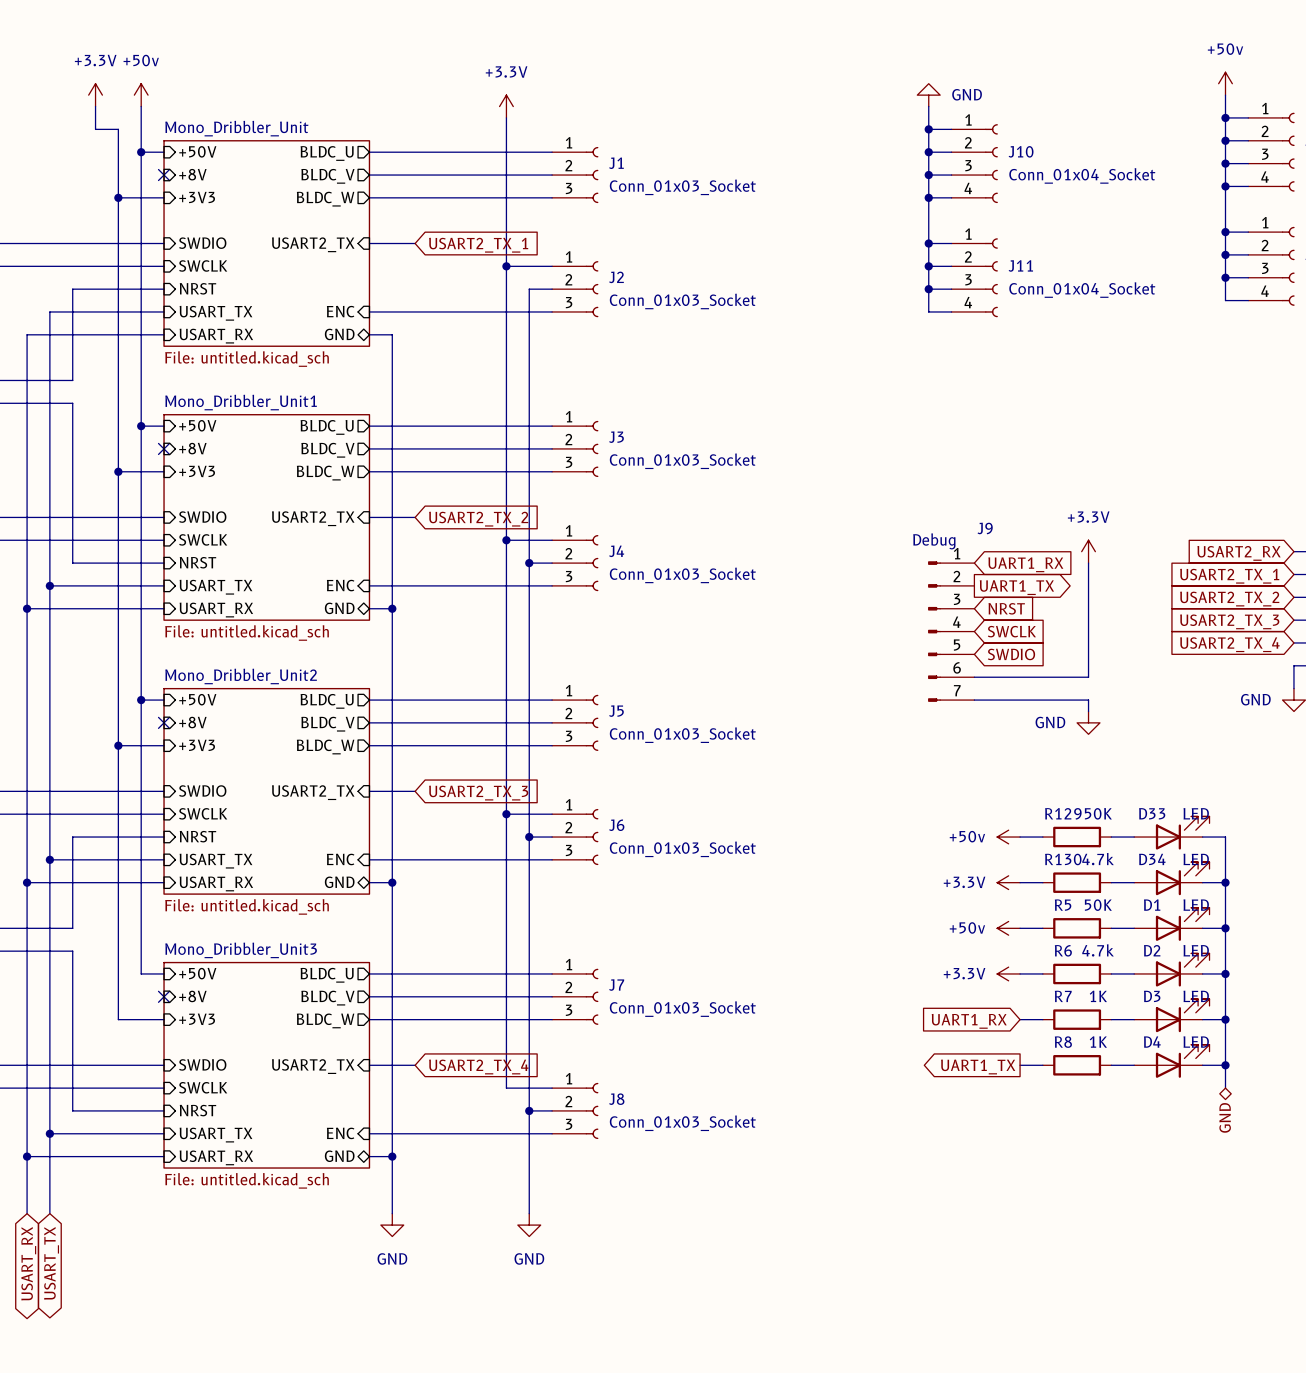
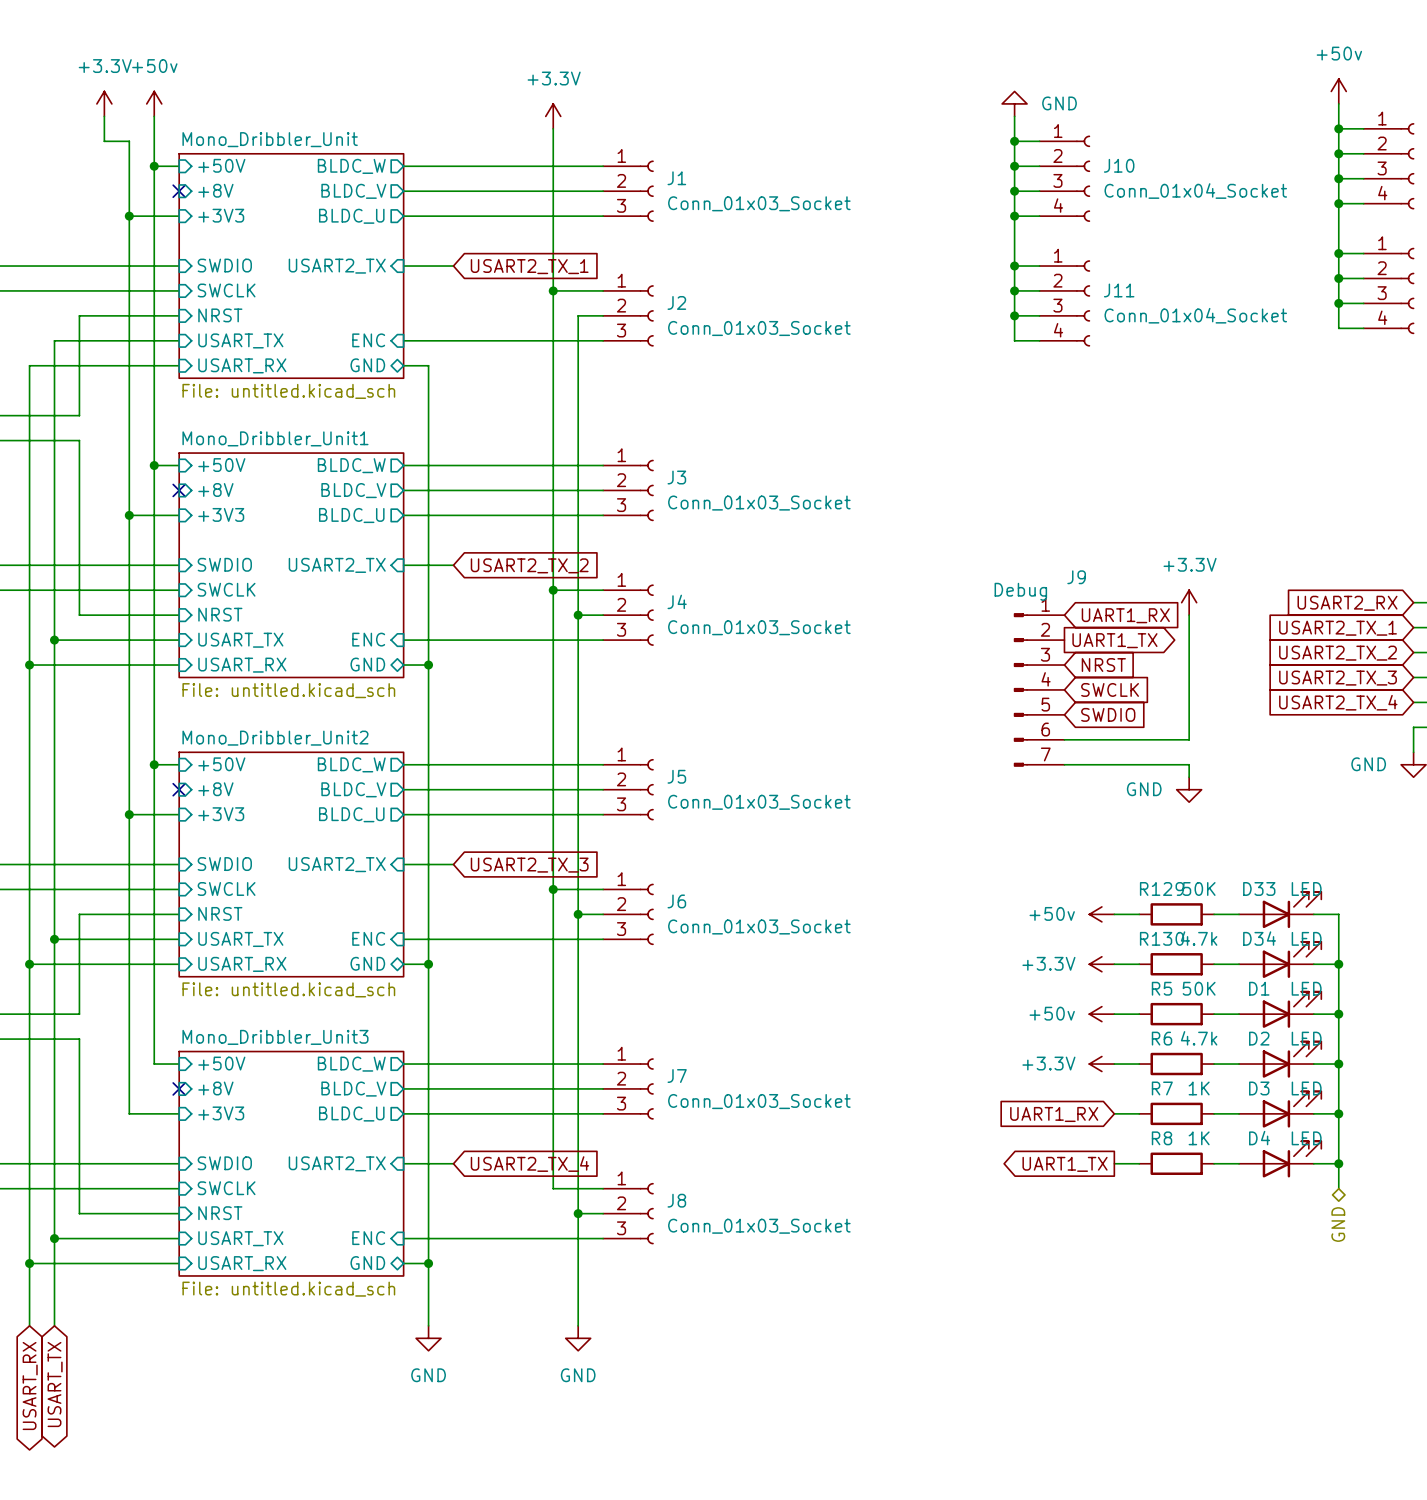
sheet pin: BLDC_U (327, 153) -> BLDC_W (351, 166)
sheet pin: BLDC_W (325, 199) -> BLDC_U (351, 216)
sheet pin: BLDC_U (327, 427) -> BLDC_W (351, 465)
sheet pin: BLDC_W (325, 473) -> BLDC_U (351, 515)
sheet pin: BLDC_U (327, 701) -> BLDC_W (351, 764)
sheet pin: BLDC_W (325, 746) -> BLDC_U (351, 814)
sheet pin: BLDC_U (327, 975) -> BLDC_W (351, 1064)
sheet pin: BLDC_W (325, 1020) -> BLDC_U (351, 1114)

